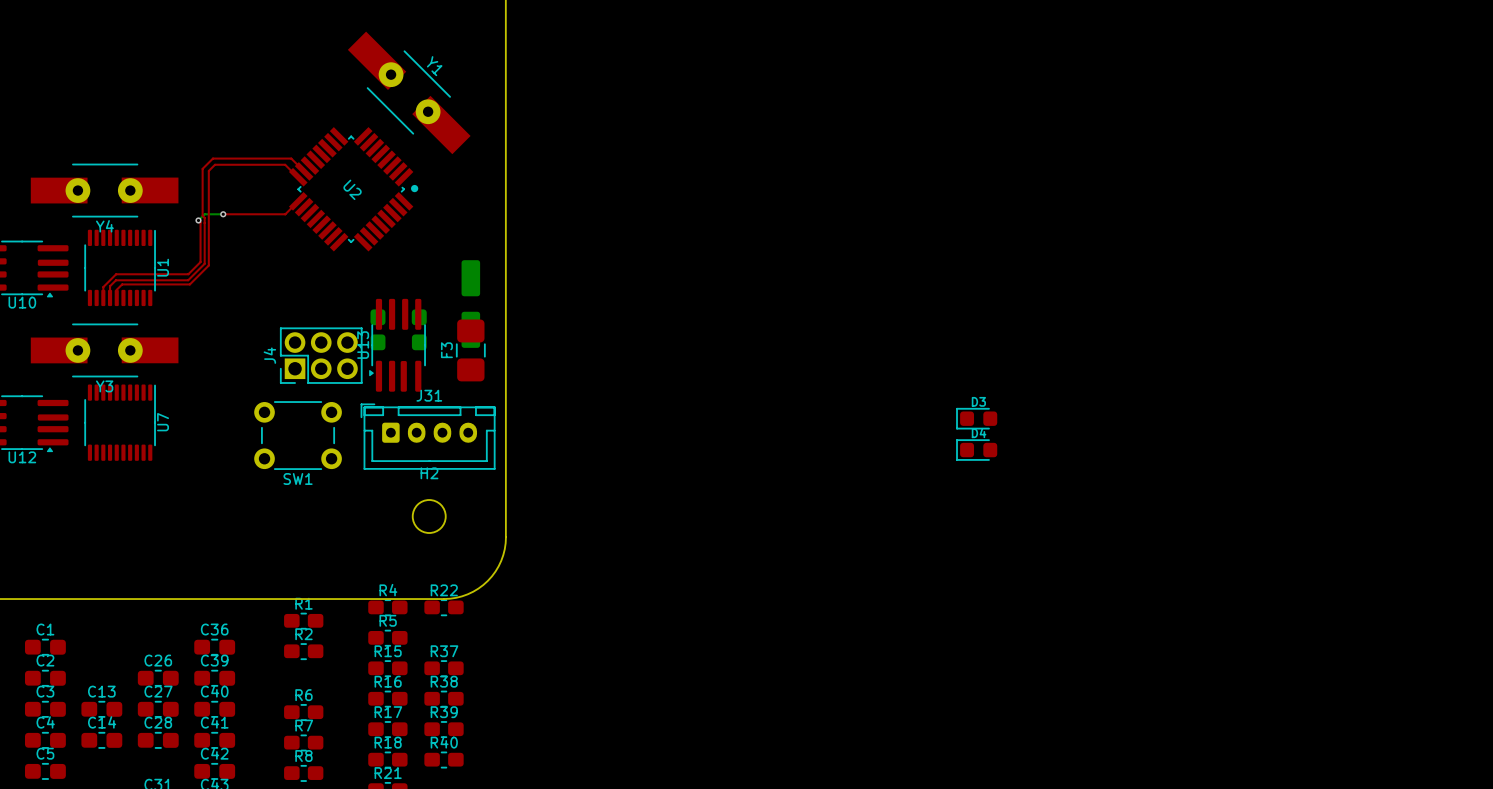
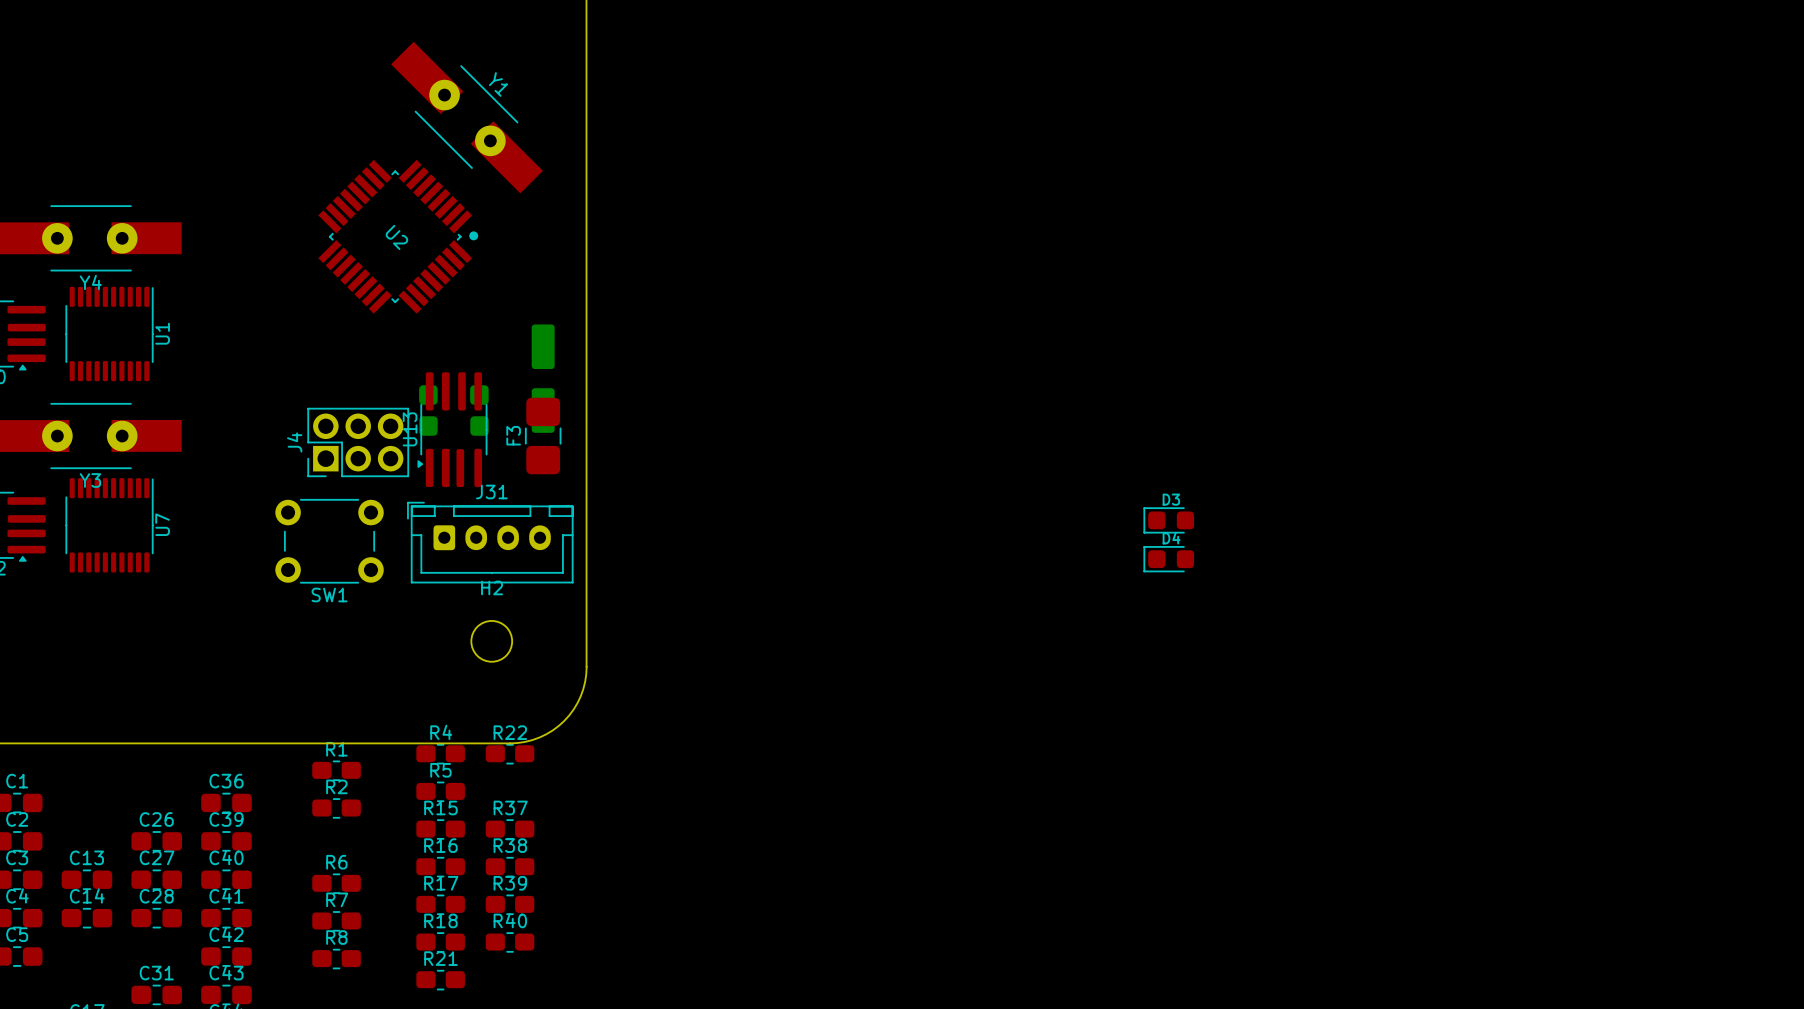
top track: (304, 171) (291, 158) (212, 158) (202, 168) (204, 263) (188, 280) (115, 280) (110, 286) (110, 297) -> none
top track: (298, 177) (285, 164) (215, 164) (208, 170) (208, 265) (189, 284) (122, 284) (116, 289) (116, 297) -> none
top track: (298, 201) (285, 214) (223, 214) -> none
bottom track: (223, 214) (204, 214) (198, 220) -> none
via: (223, 214) -> none
top track: (198, 220) (200, 222) (200, 262) (188, 274) (116, 274) (103, 287) (103, 297) -> none
via: (198, 220) -> none

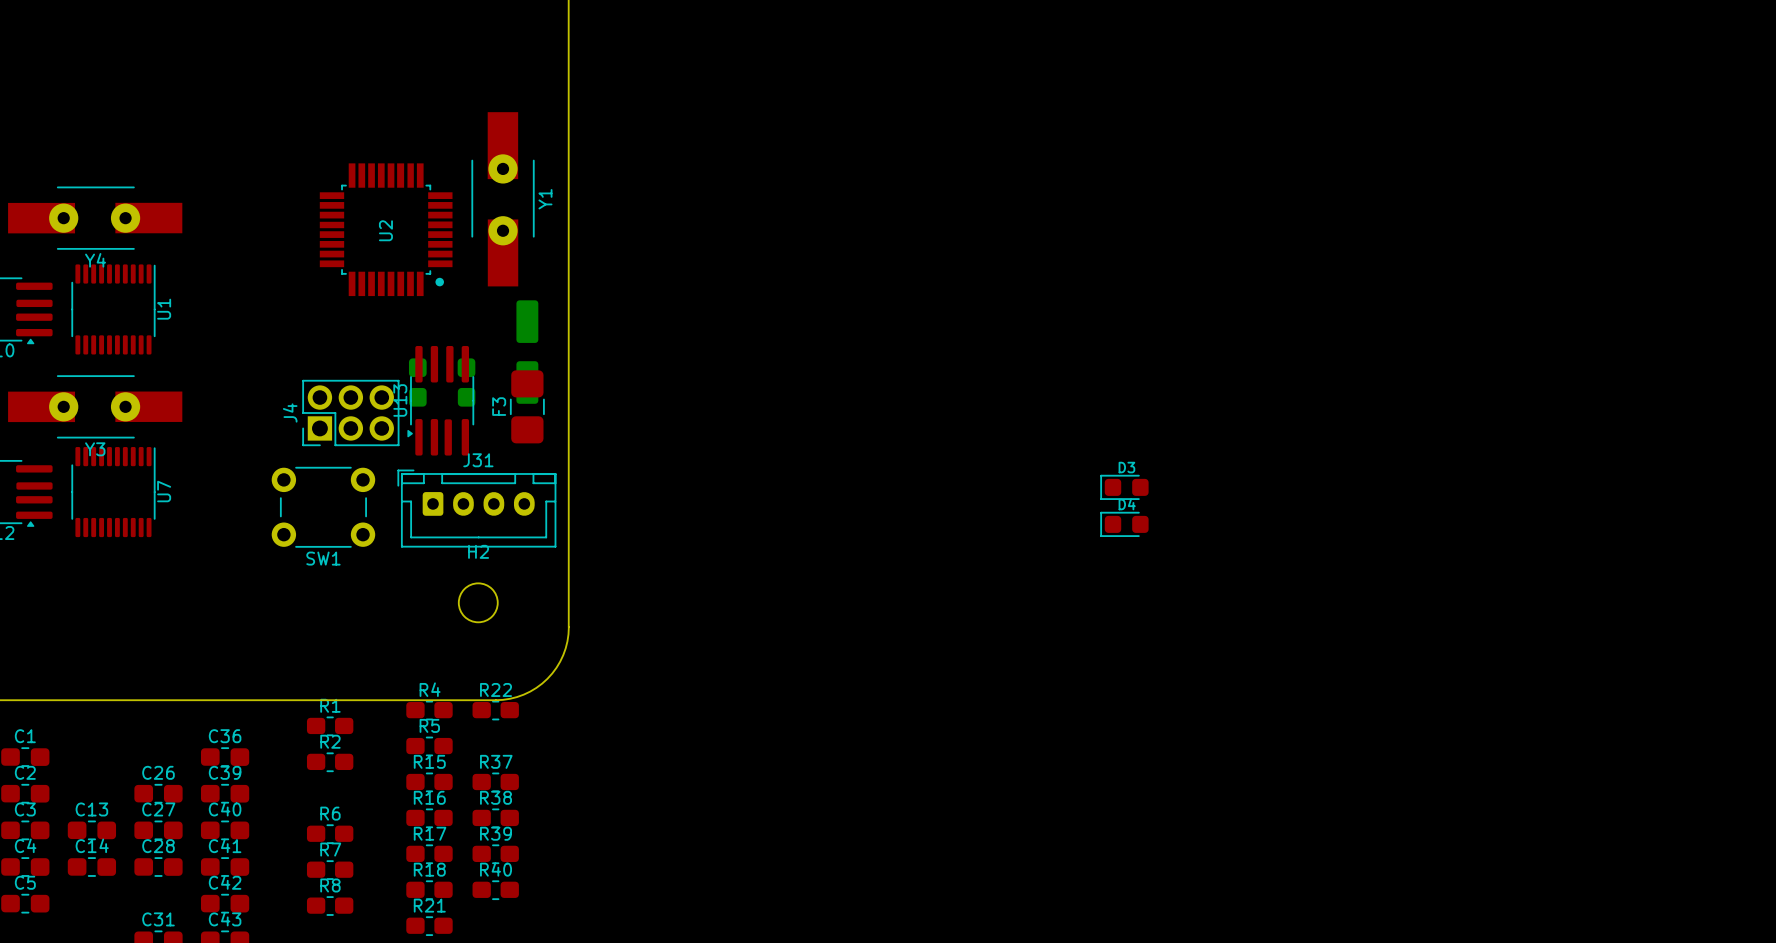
Y1 rotation: 0° (467, 117) -> 45° clockwise (503, 199)
Y1 position: (467, 117) -> (503, 199)
U2 rotation: 0° (398, 236) -> 45° clockwise (386, 229)

